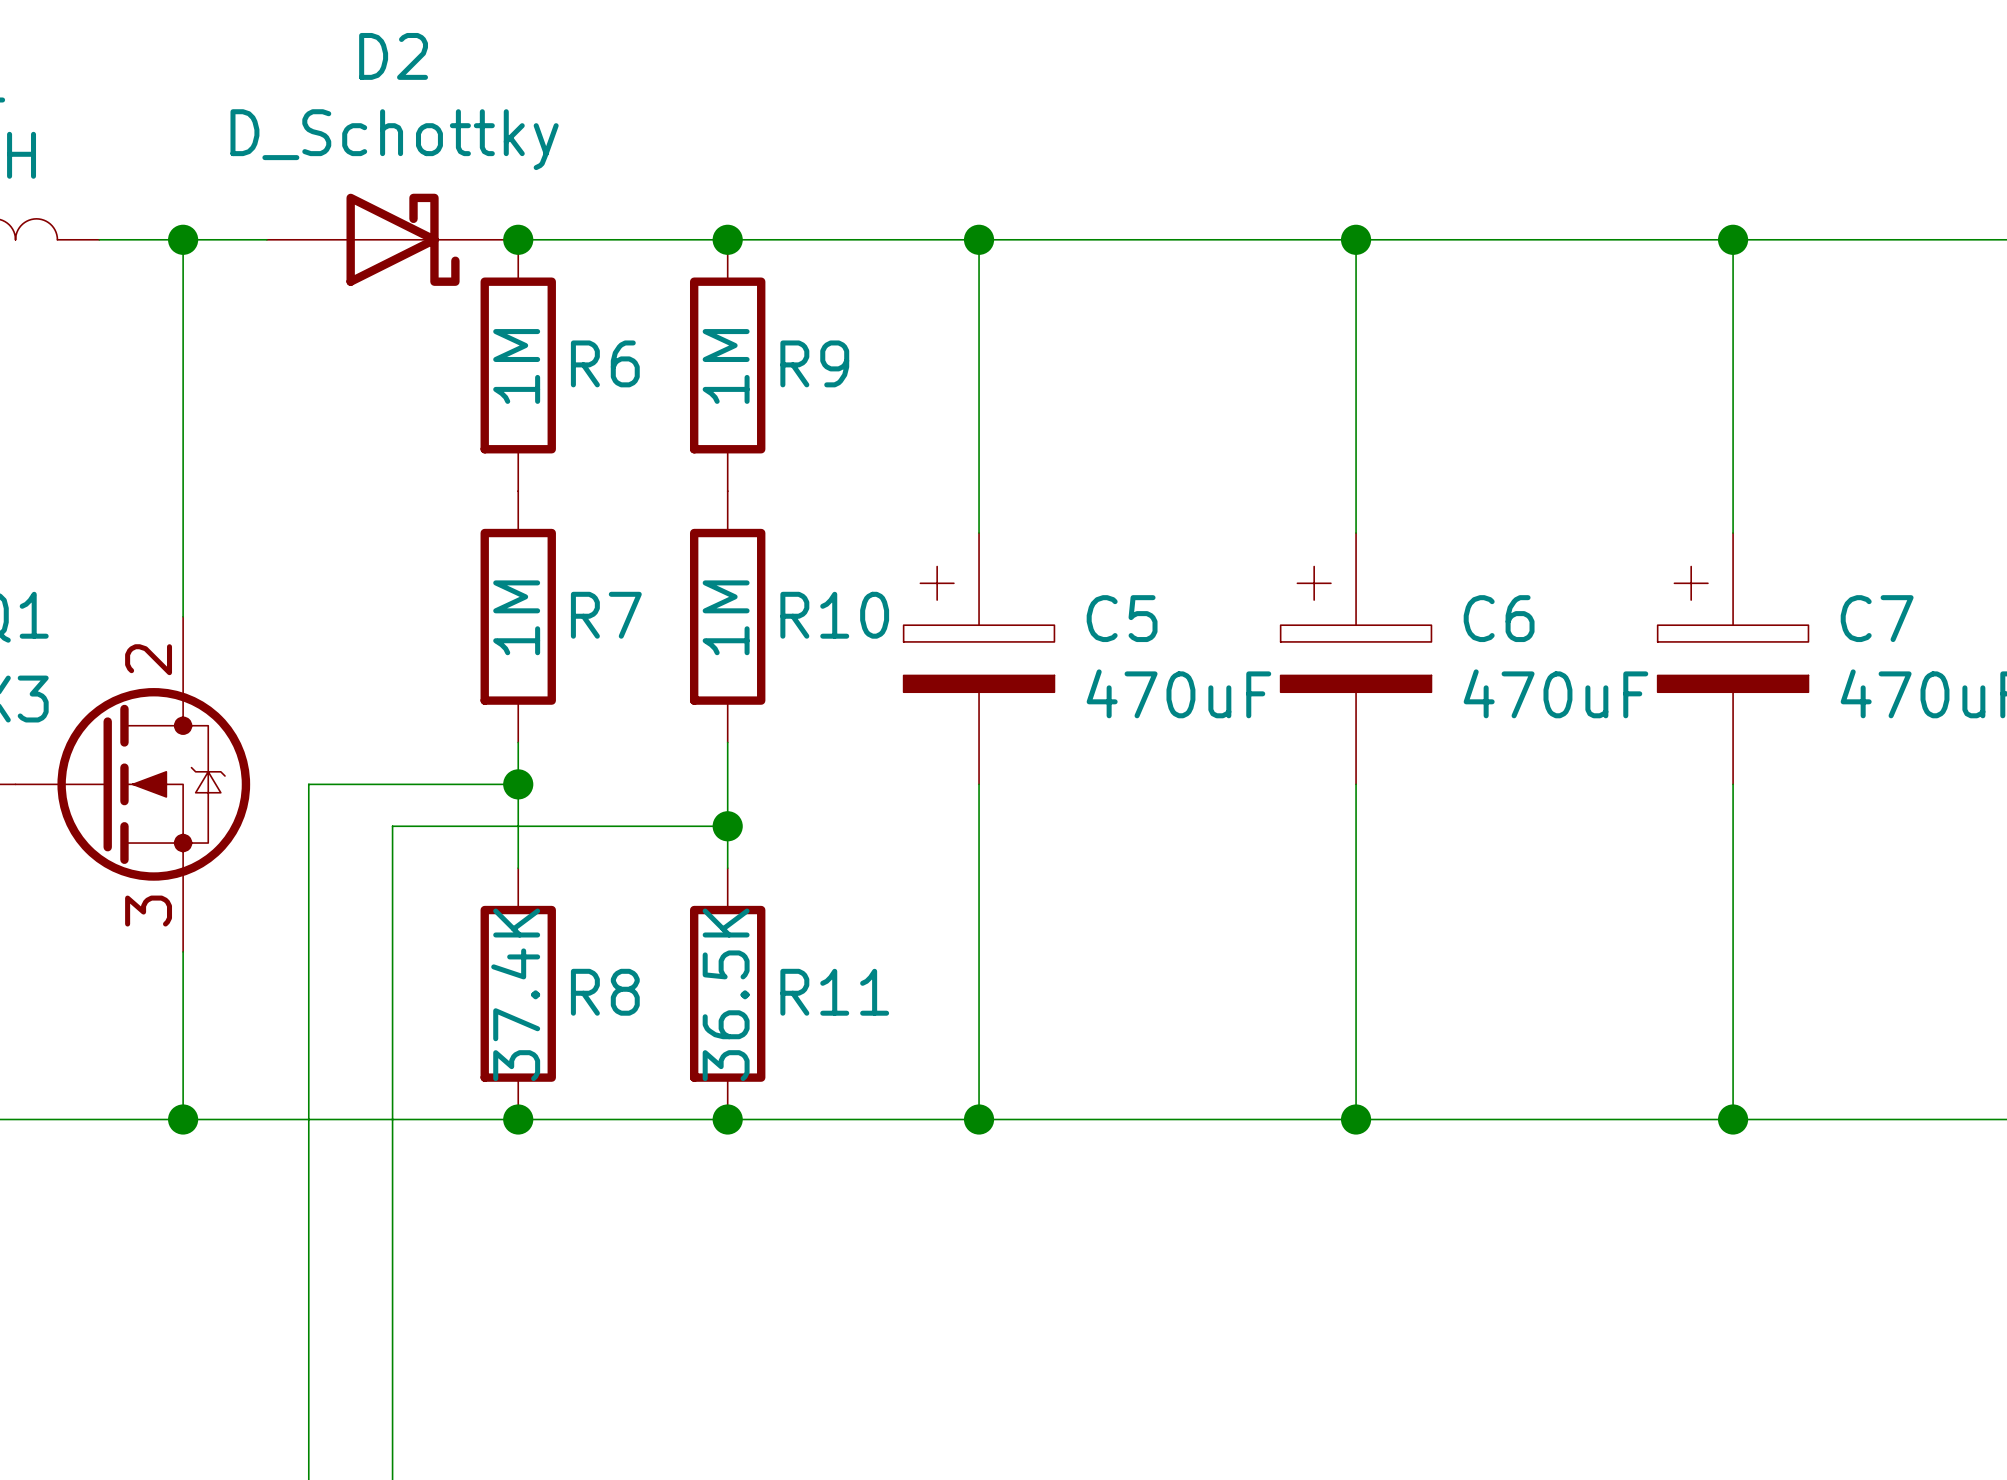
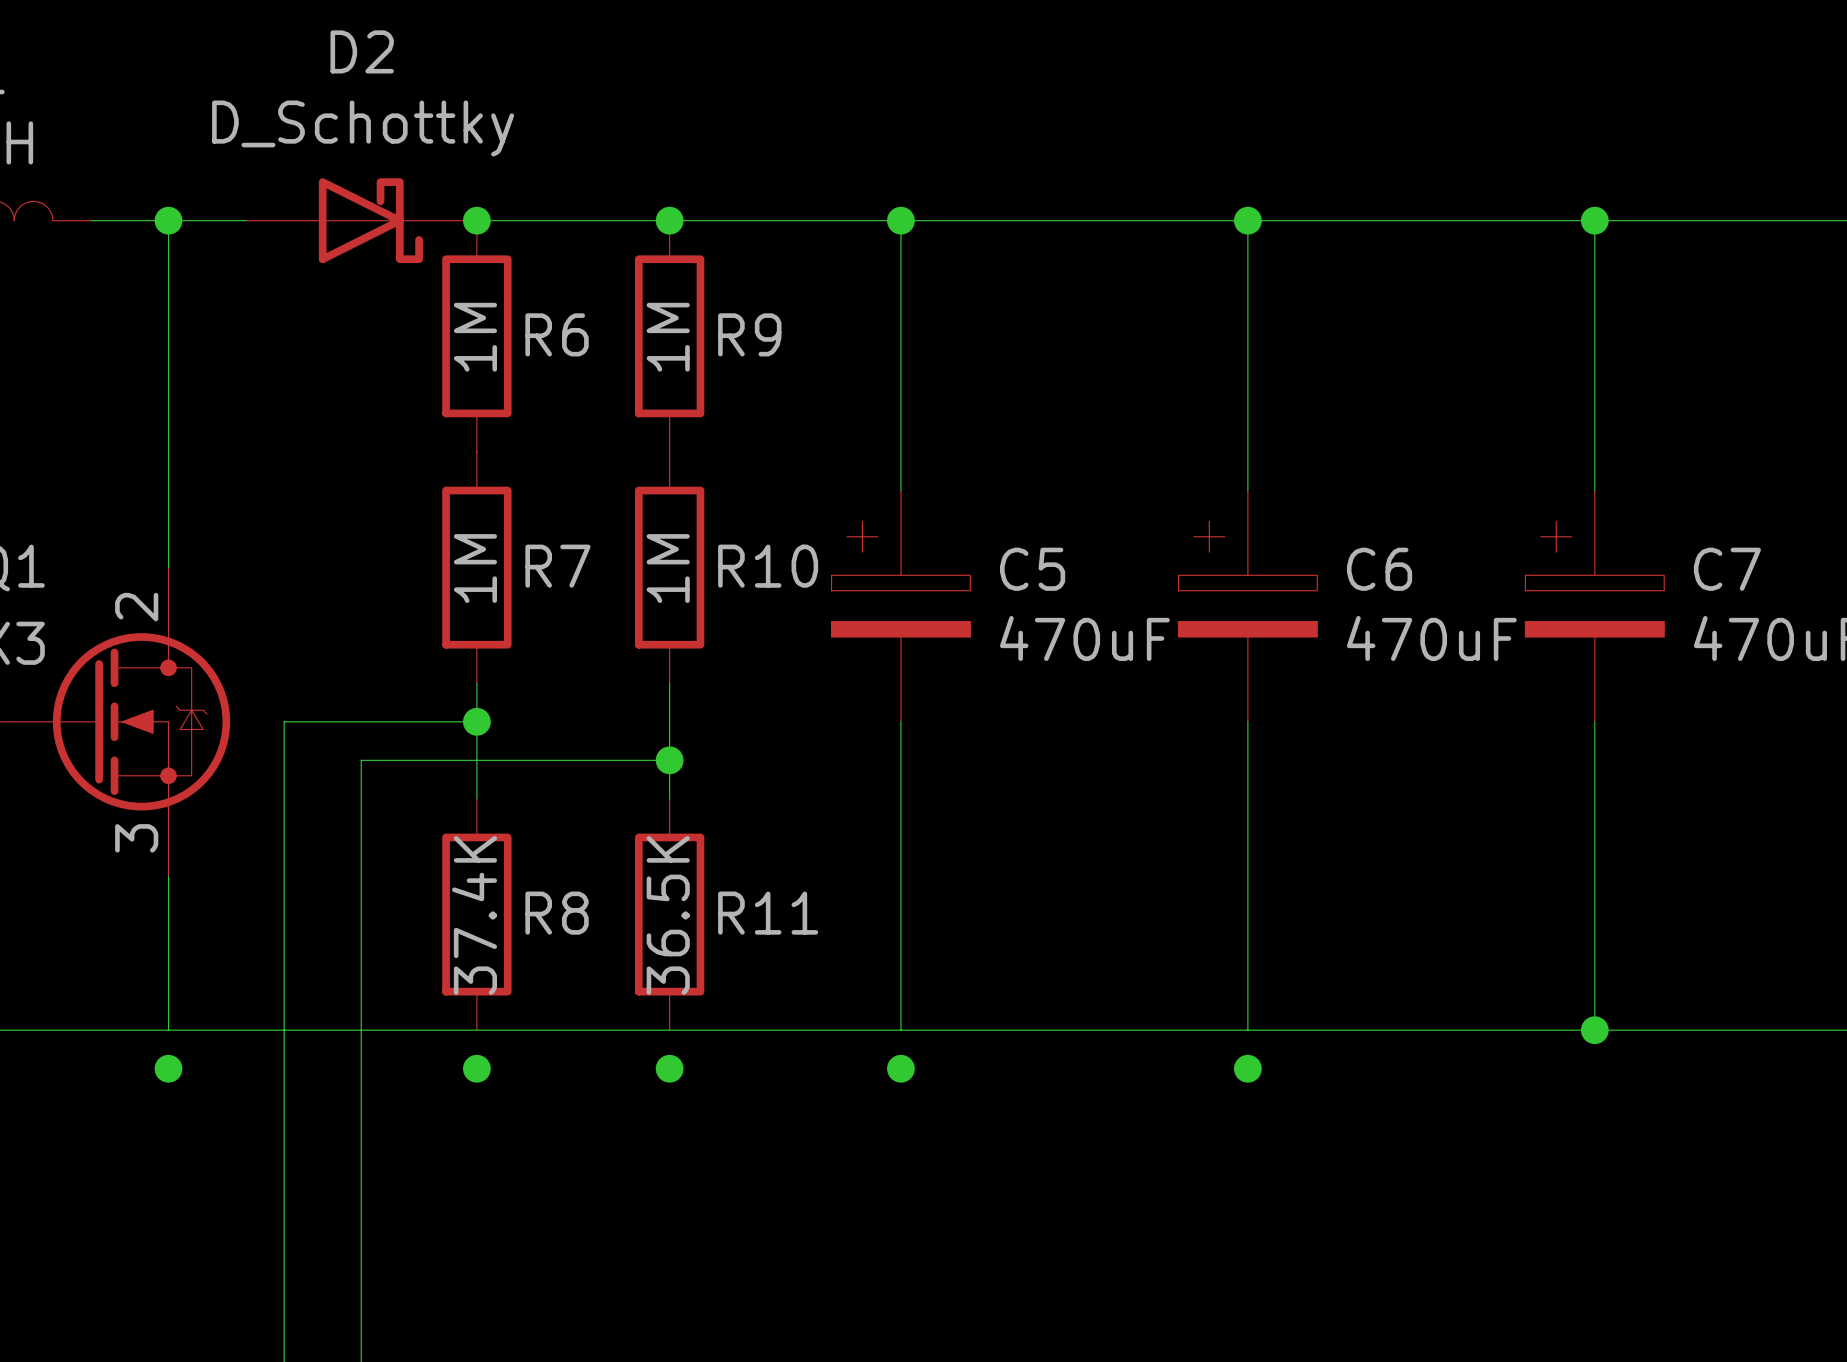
junction position: (183, 1119) -> (168, 1068)
junction position: (518, 1119) -> (476, 1068)
junction position: (727, 1119) -> (669, 1068)
junction position: (979, 1119) -> (900, 1068)
junction position: (1356, 1119) -> (1247, 1068)

